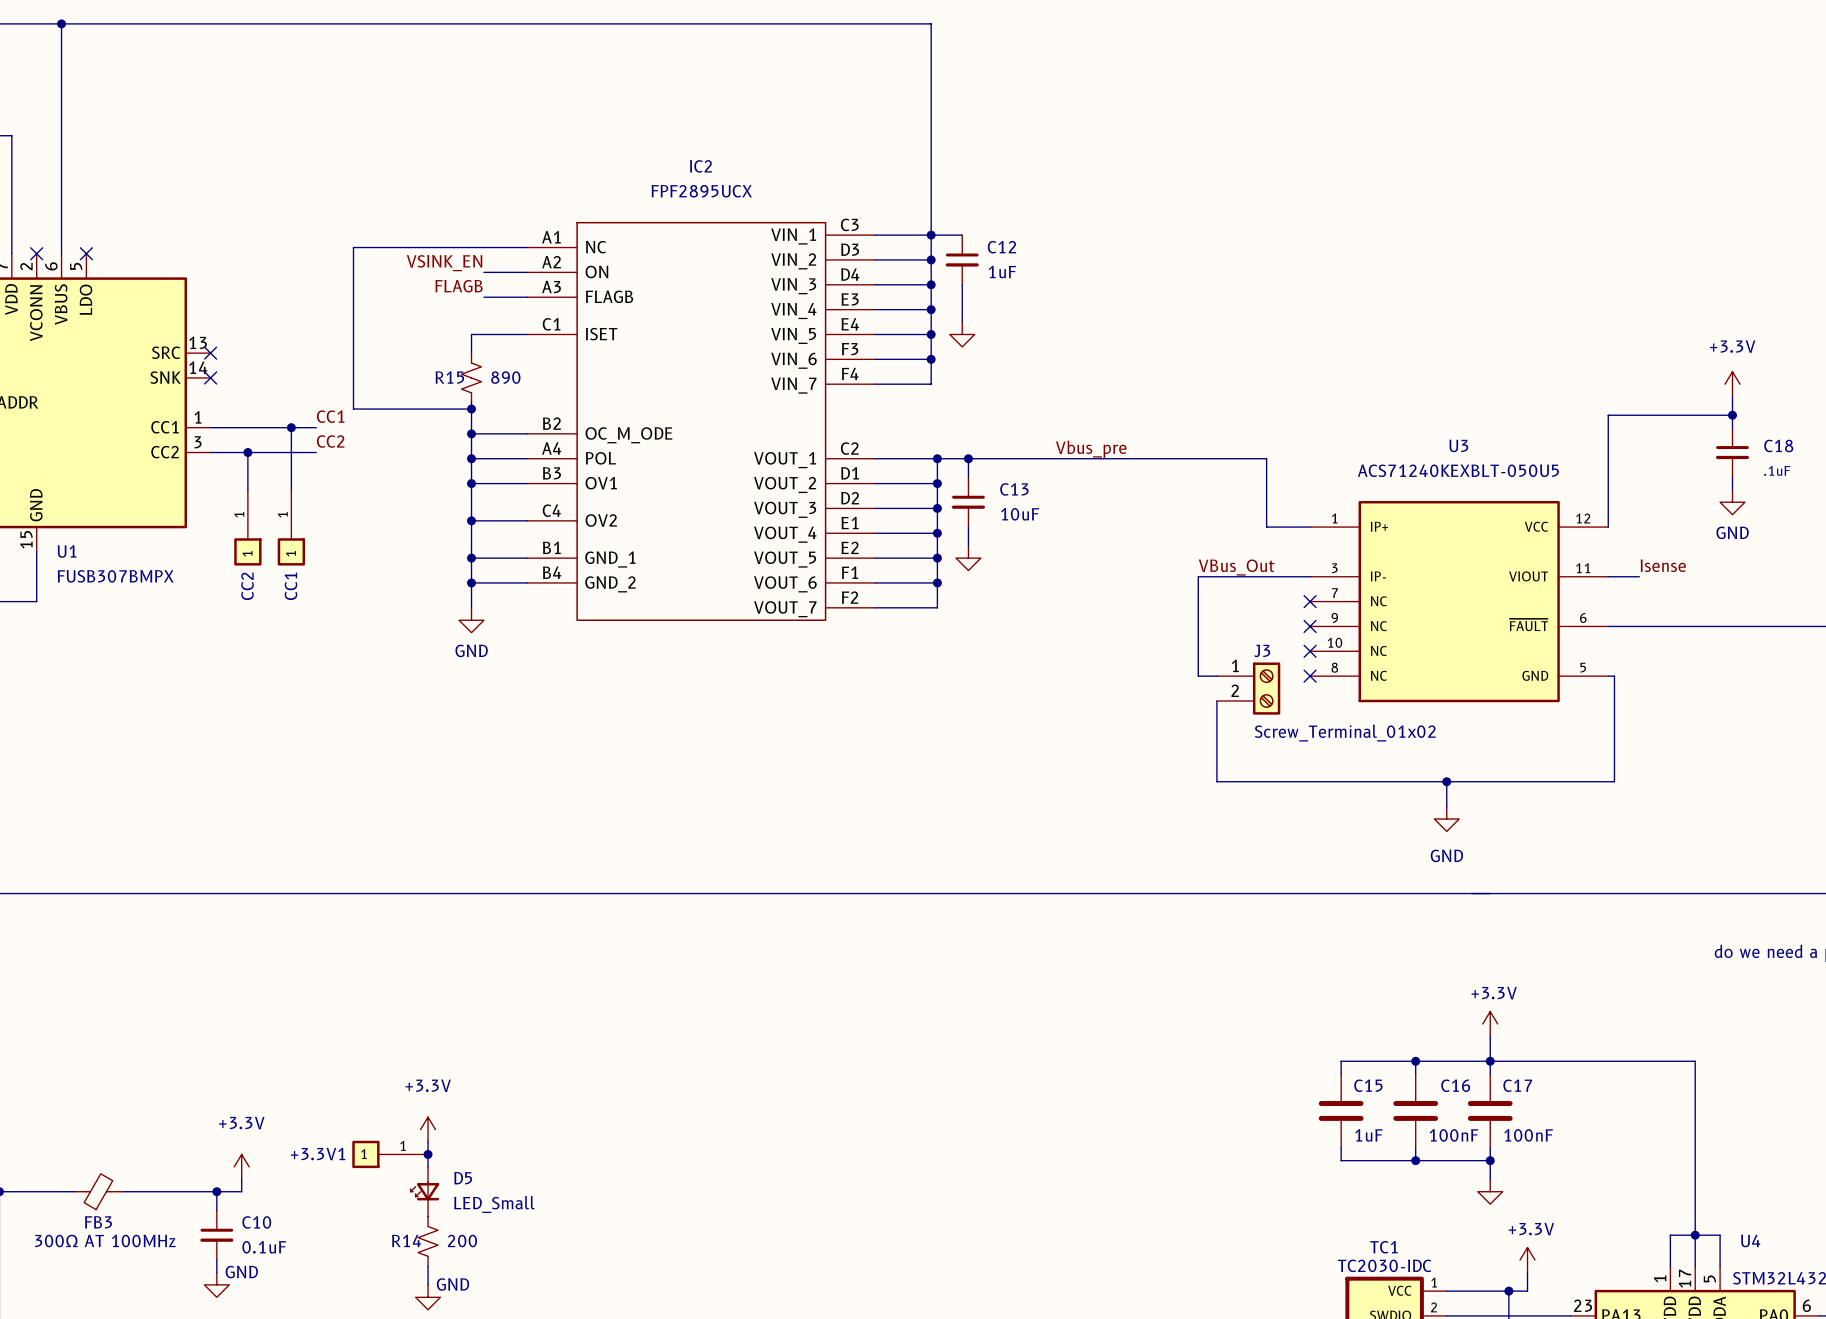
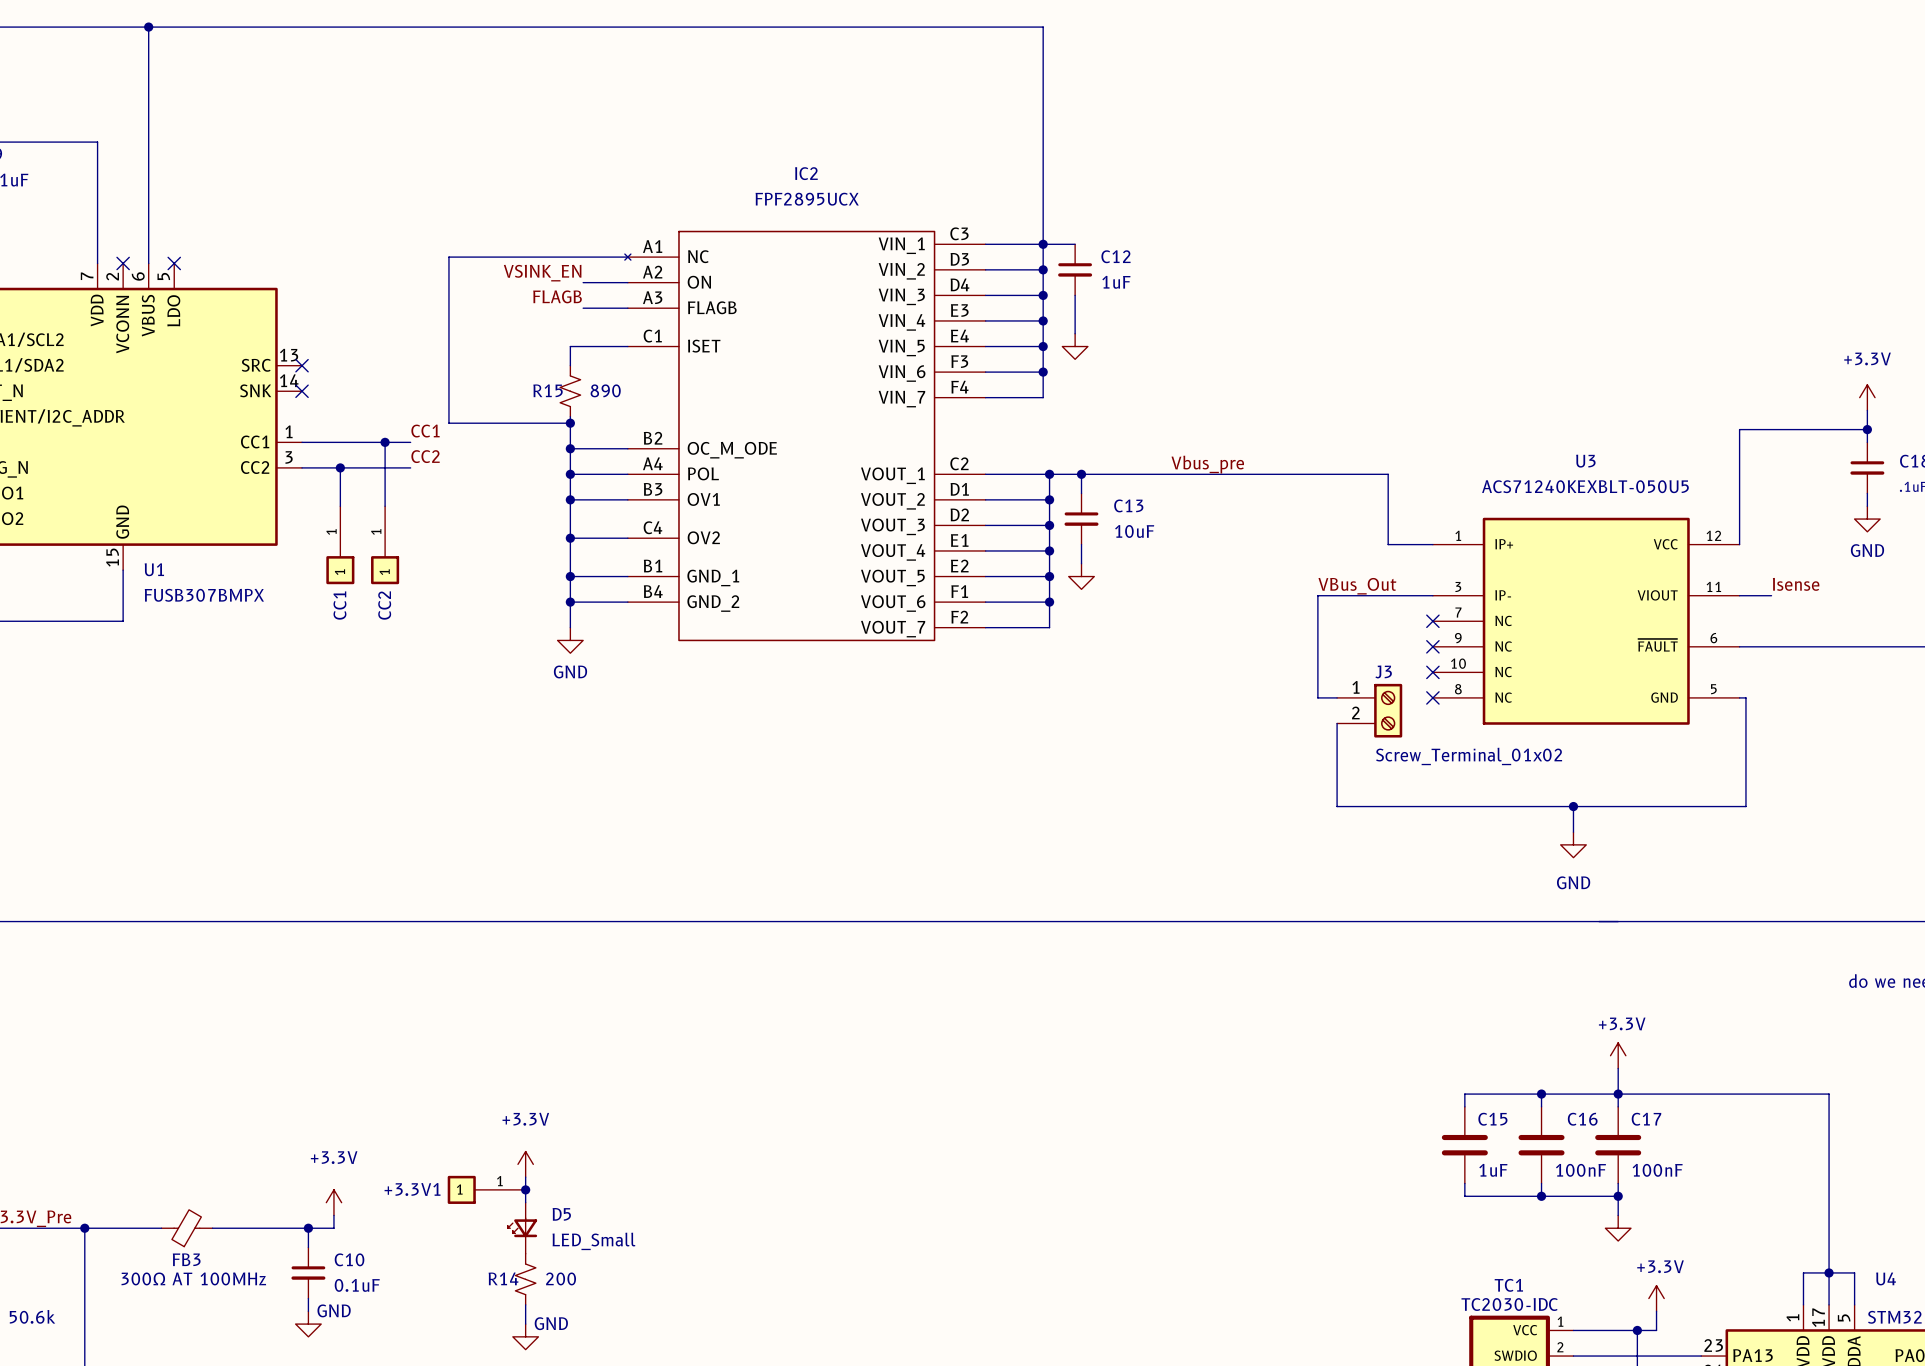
IC2 symbol: [527, 221, 876, 621] -> [624, 230, 986, 642]
CC2 name: CC2 (247, 586) -> CC1 (339, 605)
CC1 name: CC1 (290, 586) -> CC2 (384, 605)

